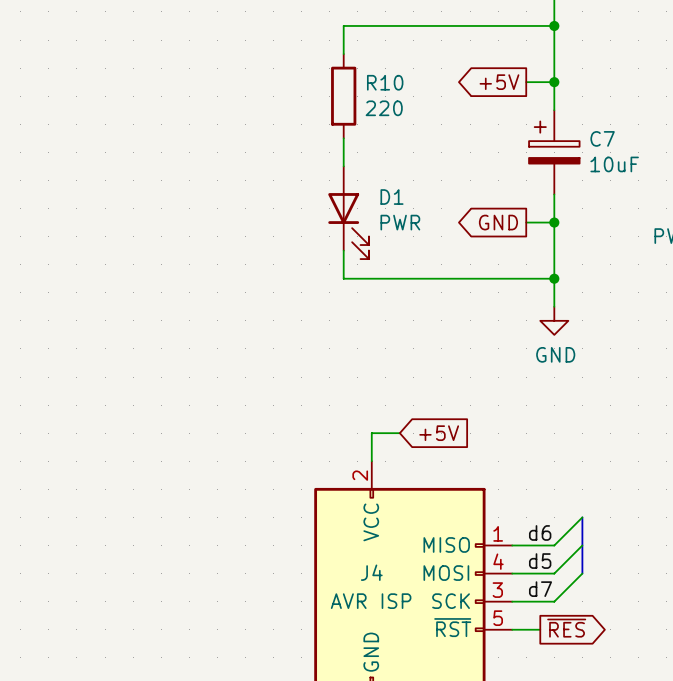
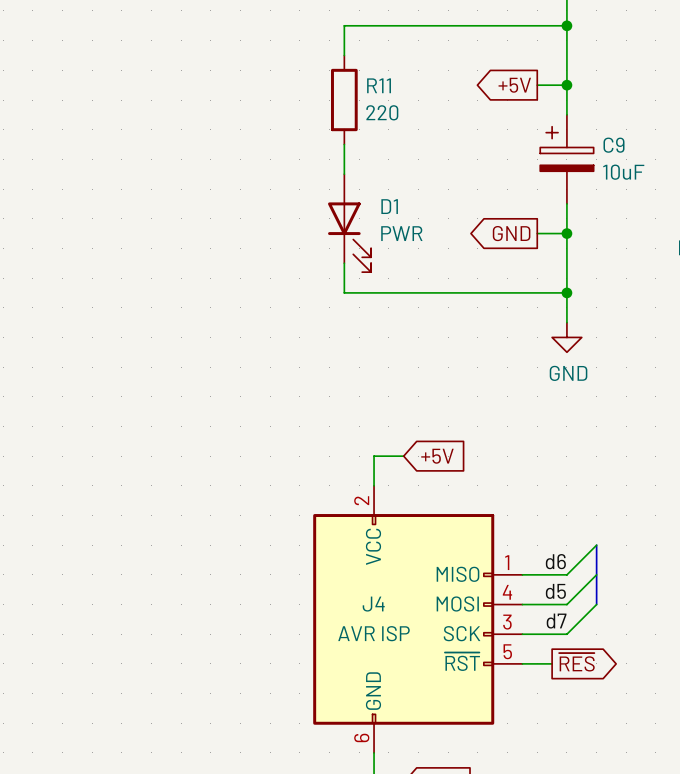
R10 name: R10 (385, 82) -> R11 (379, 85)
C7 name: C7 (602, 138) -> C9 (613, 145)

